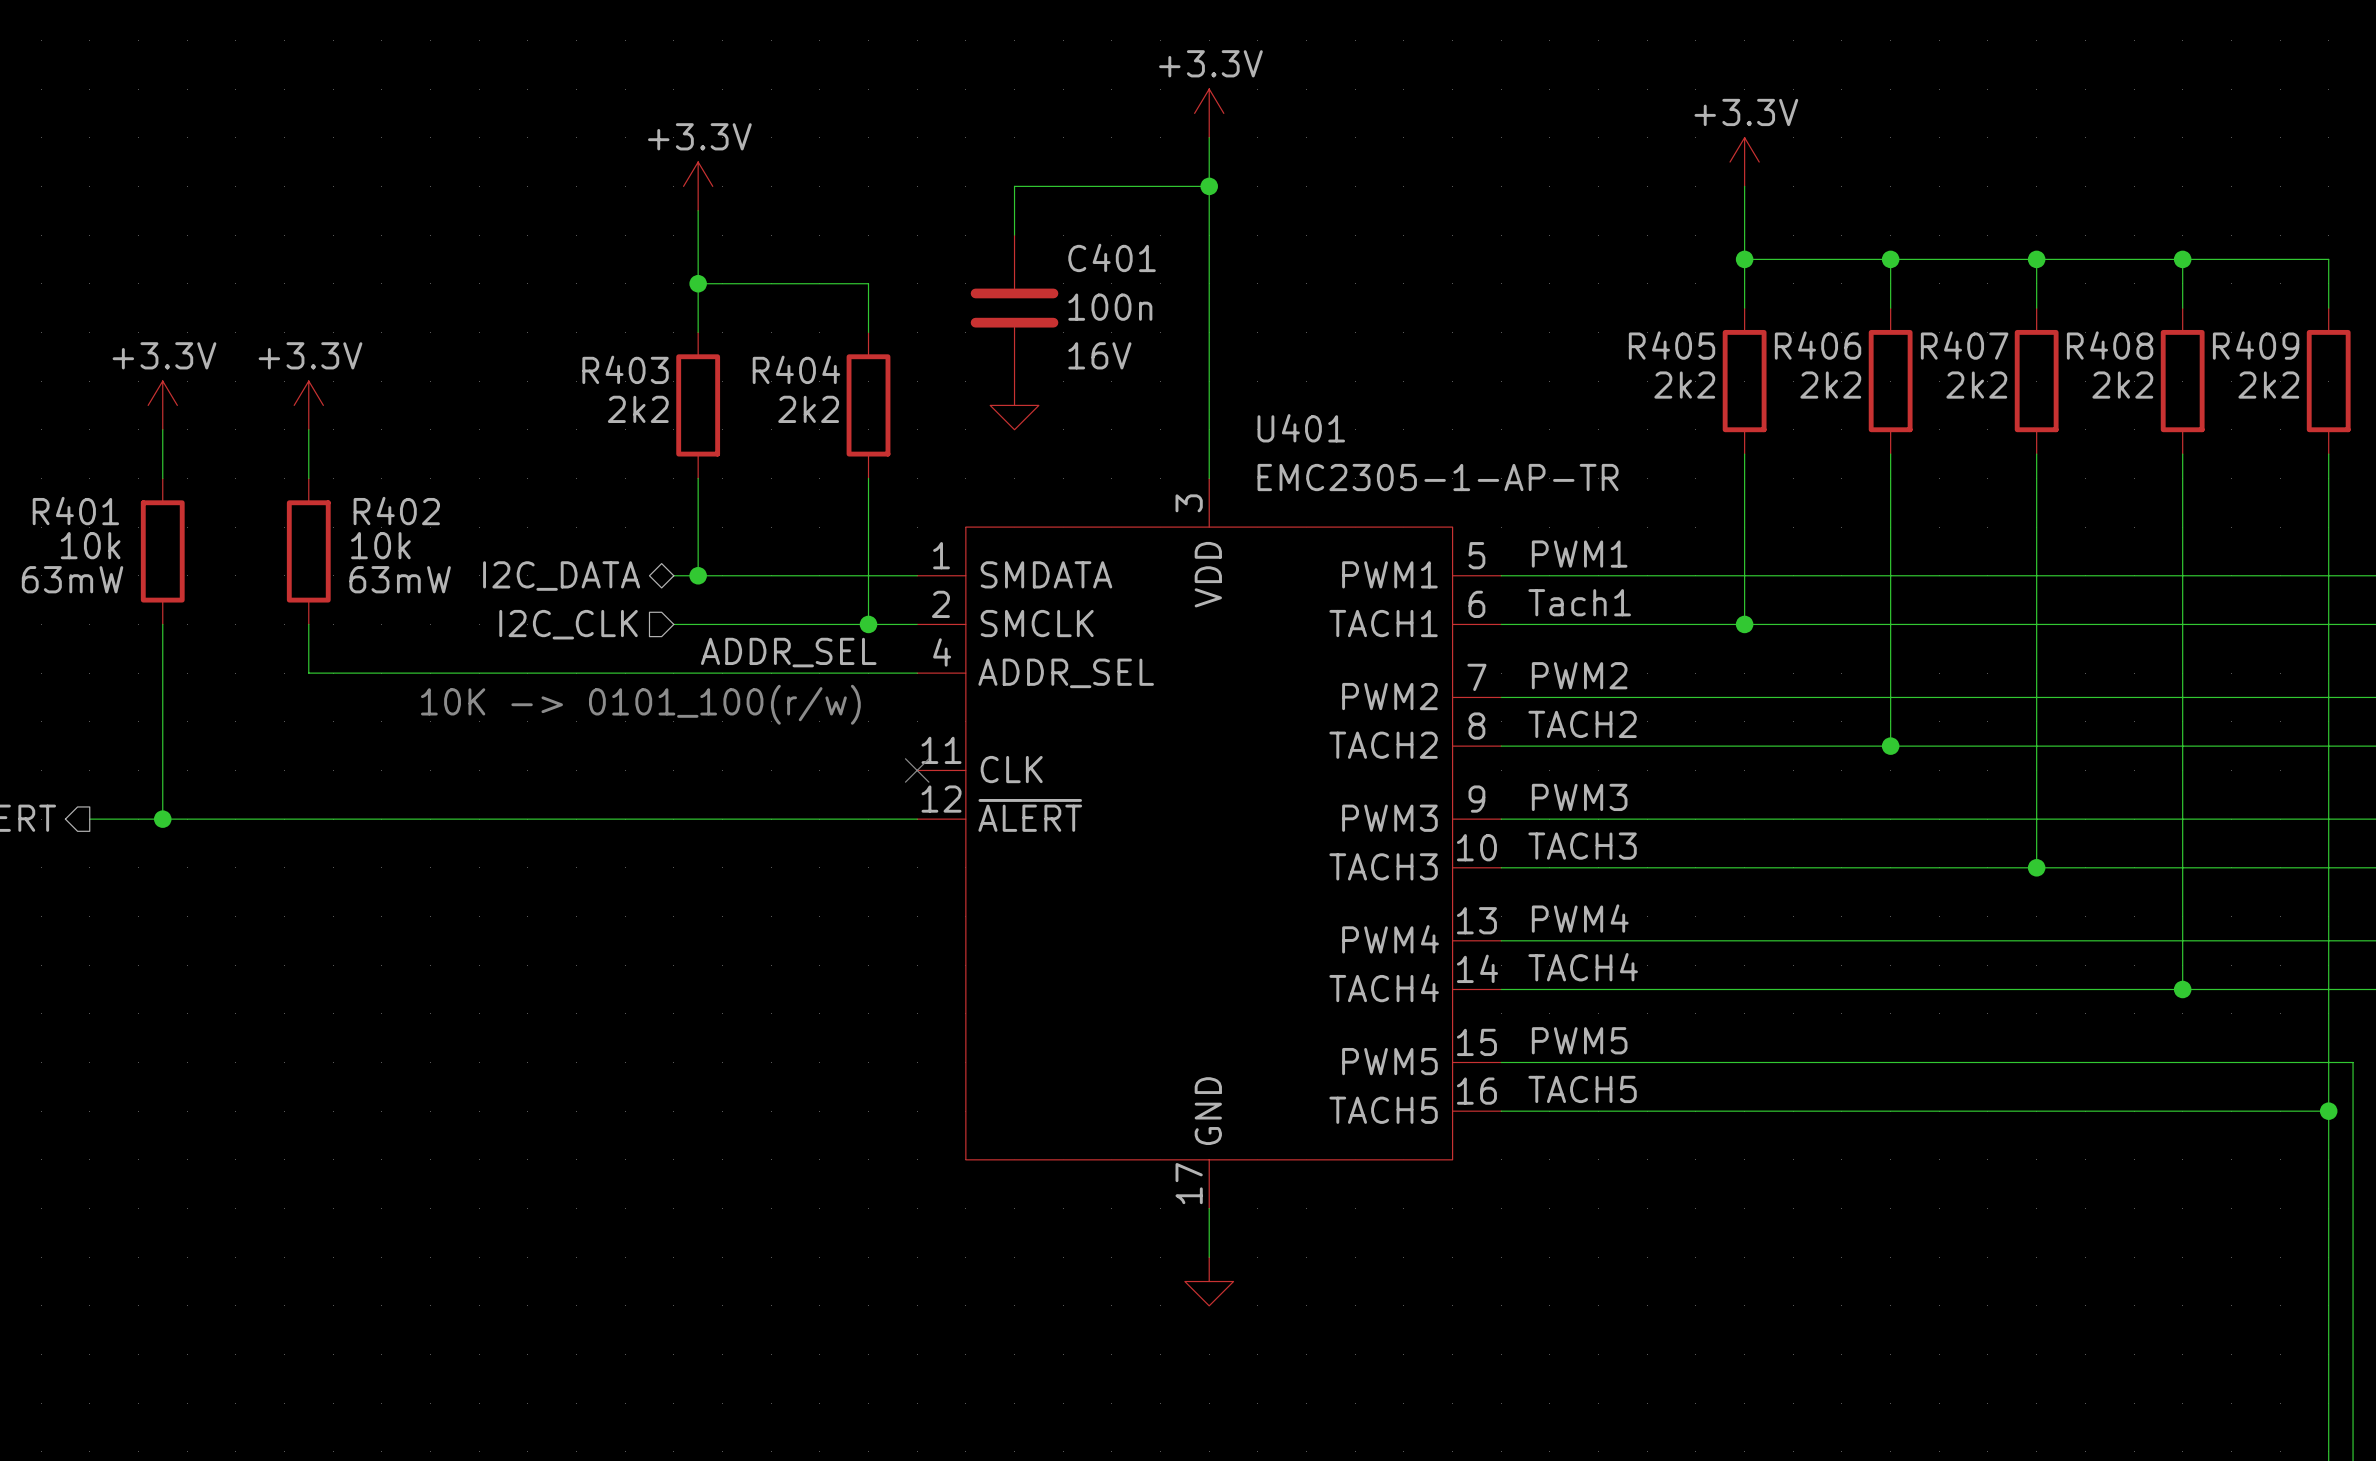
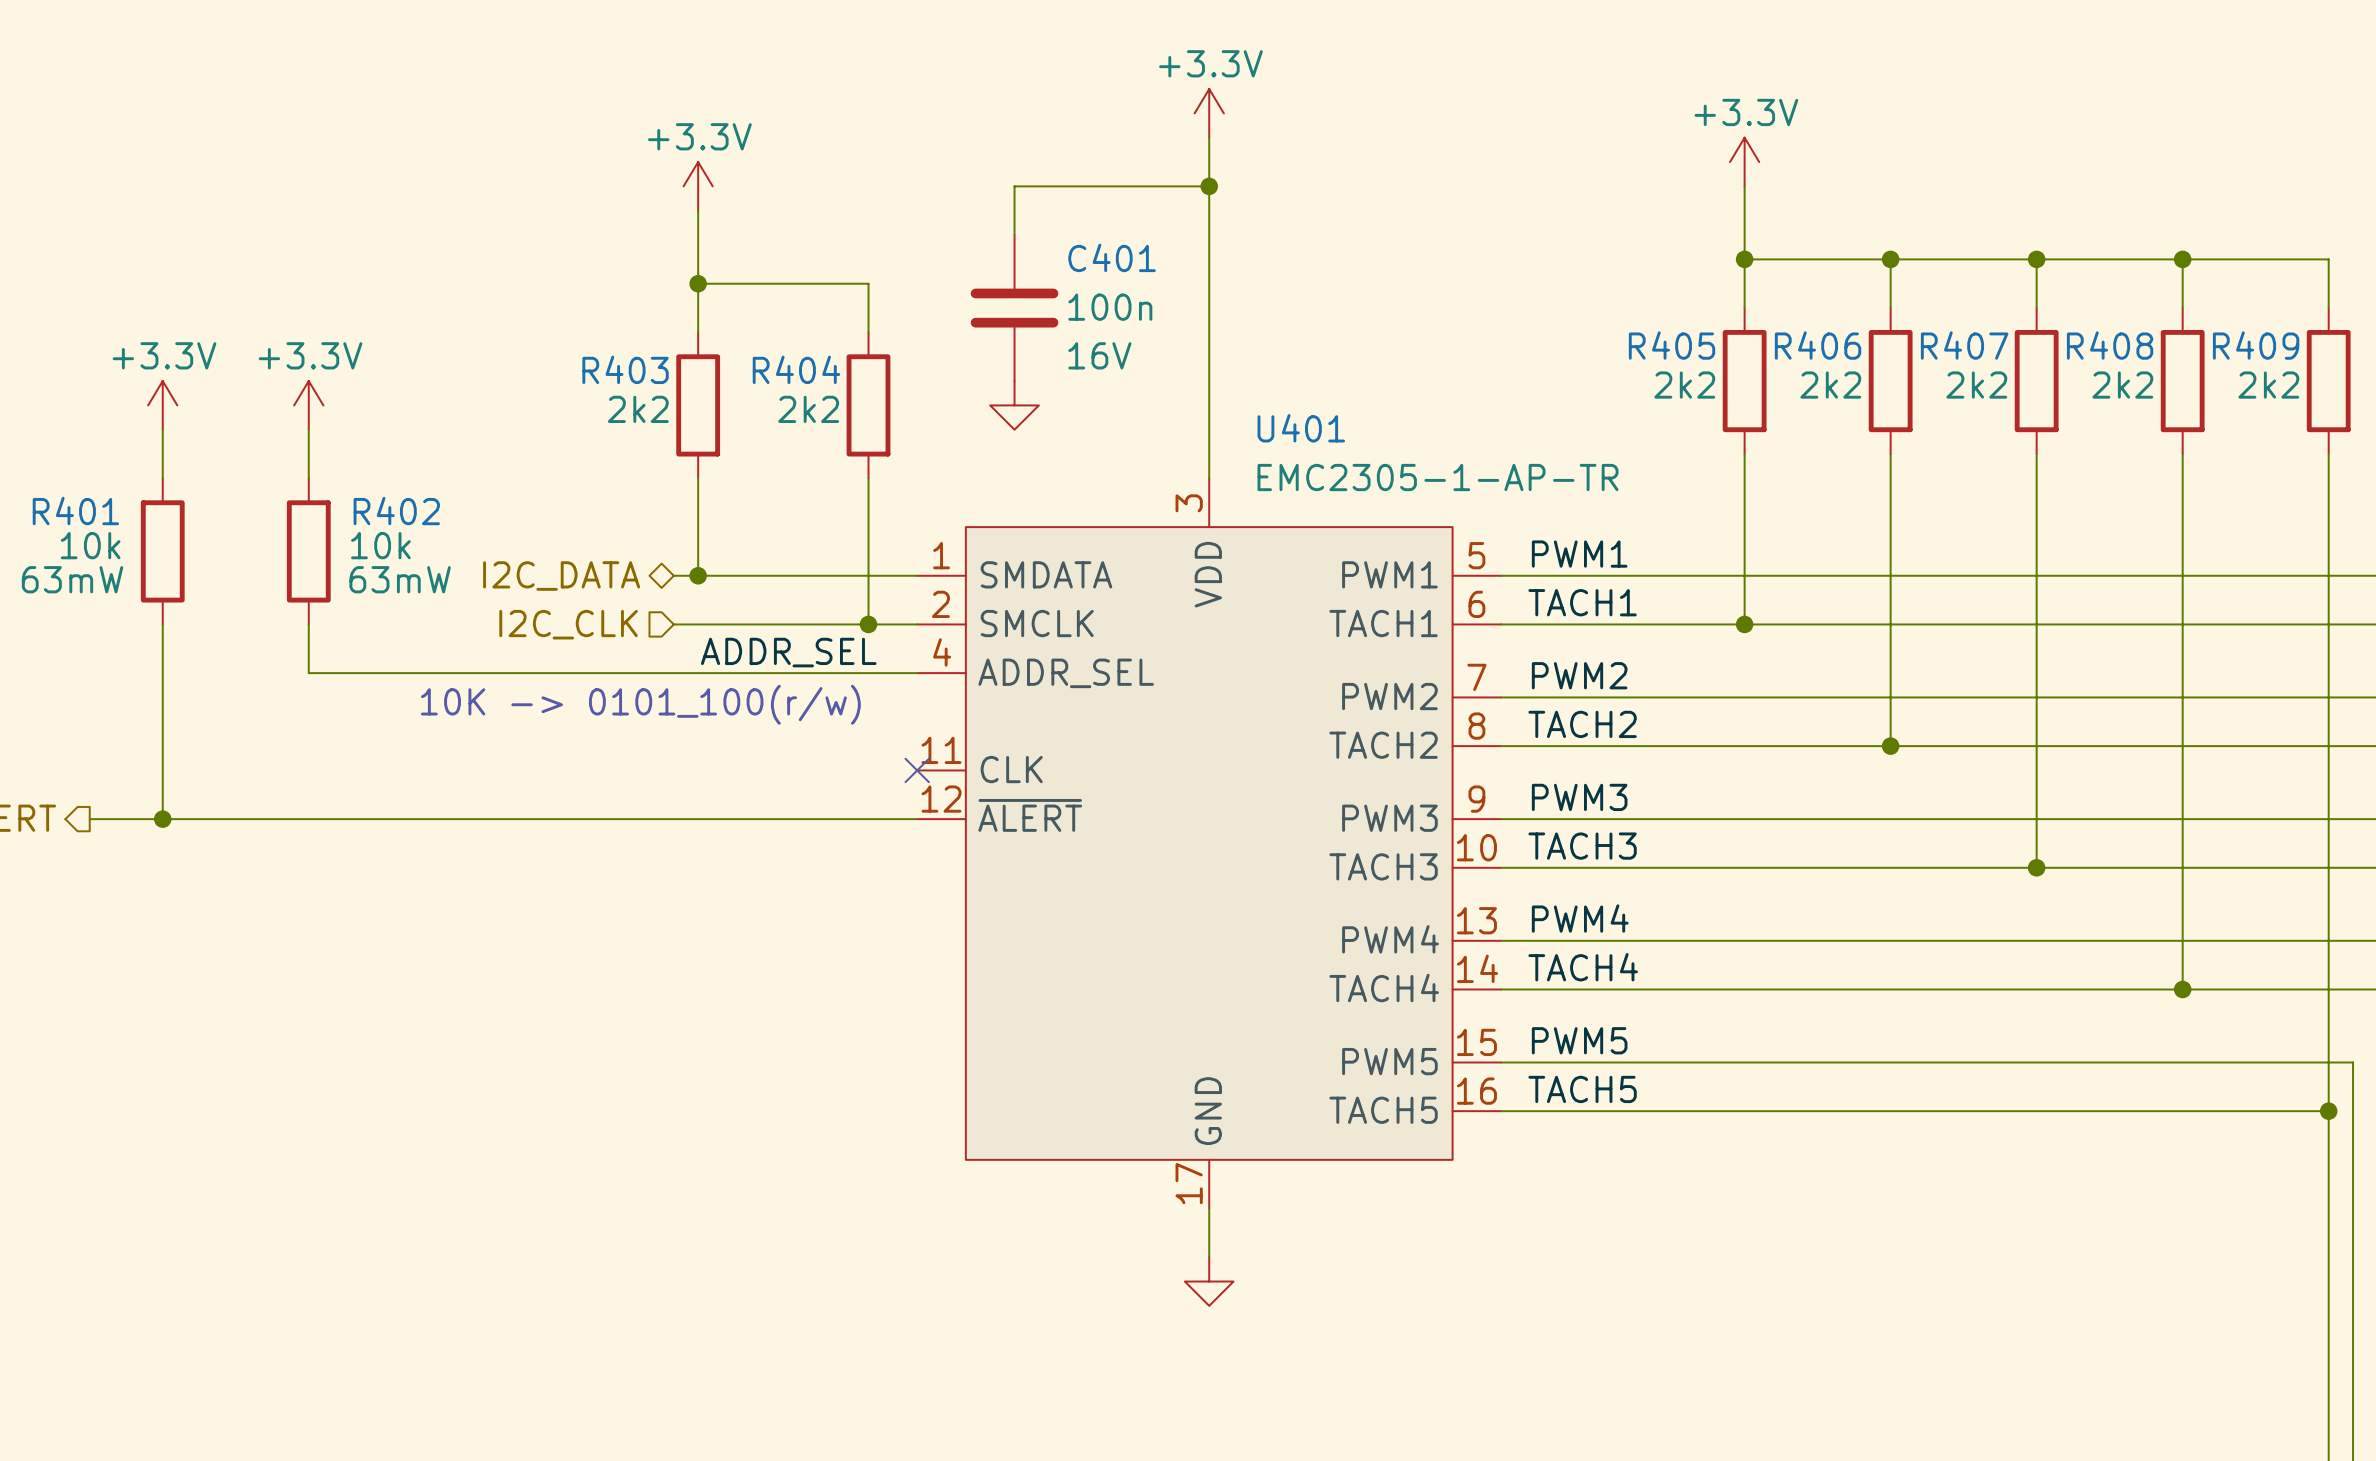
label: Tach1 (1579, 602) -> TACH1 (1582, 602)

